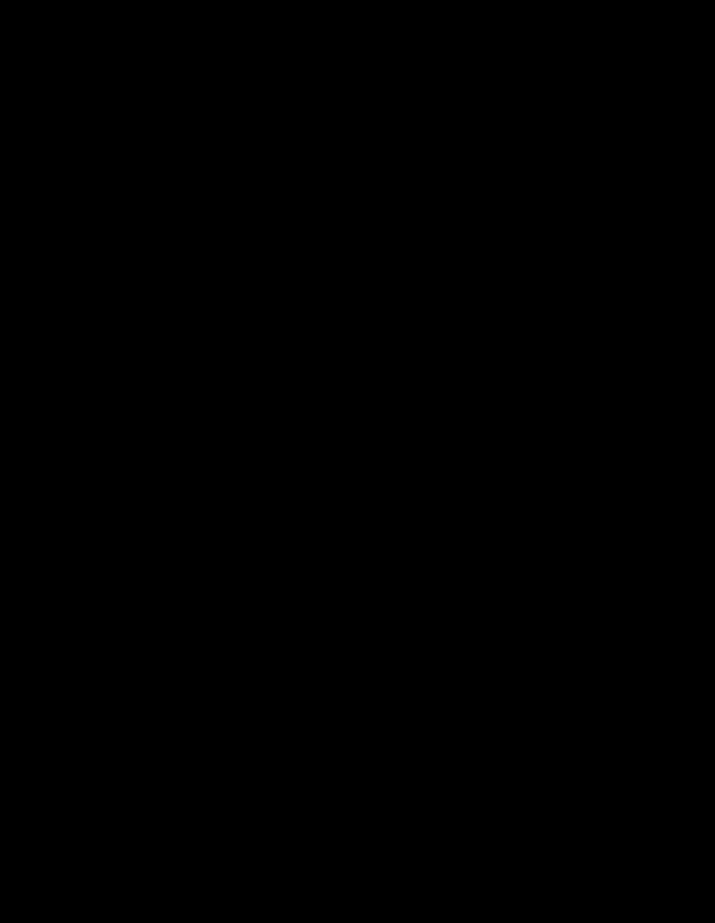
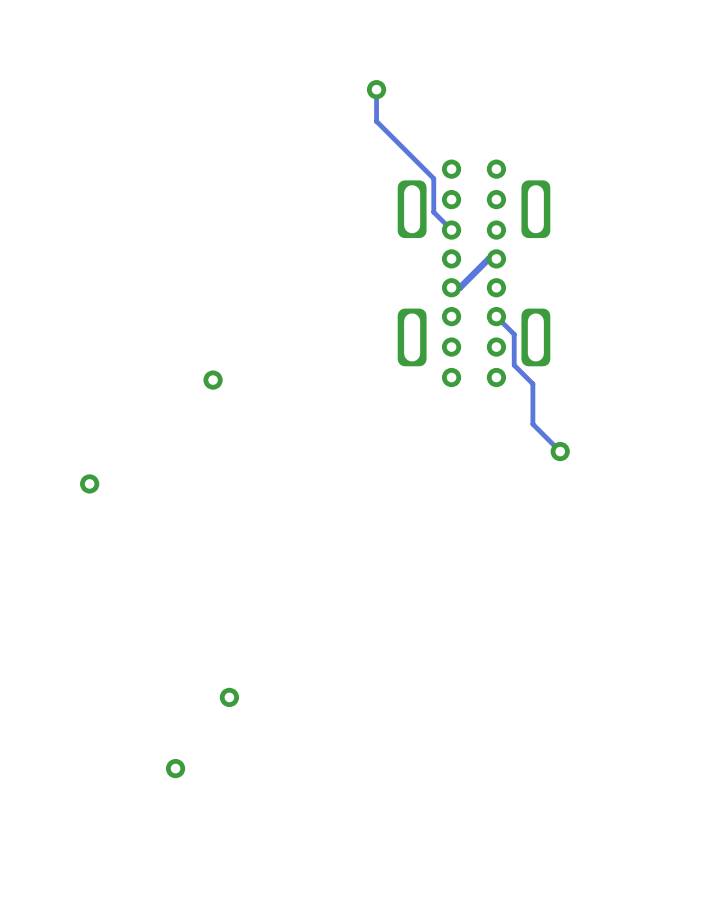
track: none -> (376, 89) (376, 121) (433, 178) (433, 212) (451, 230)
via: none -> (376, 89)
track: none -> (496, 258) (488, 258) (459, 287) (451, 287)
part: none -> (473, 273)
track: none -> (496, 316) (514, 334) (514, 365) (532, 383) (532, 424) (560, 451)
via: none -> (213, 380)
via: none -> (560, 451)
via: none -> (89, 483)
via: none -> (229, 697)
via: none -> (175, 768)

